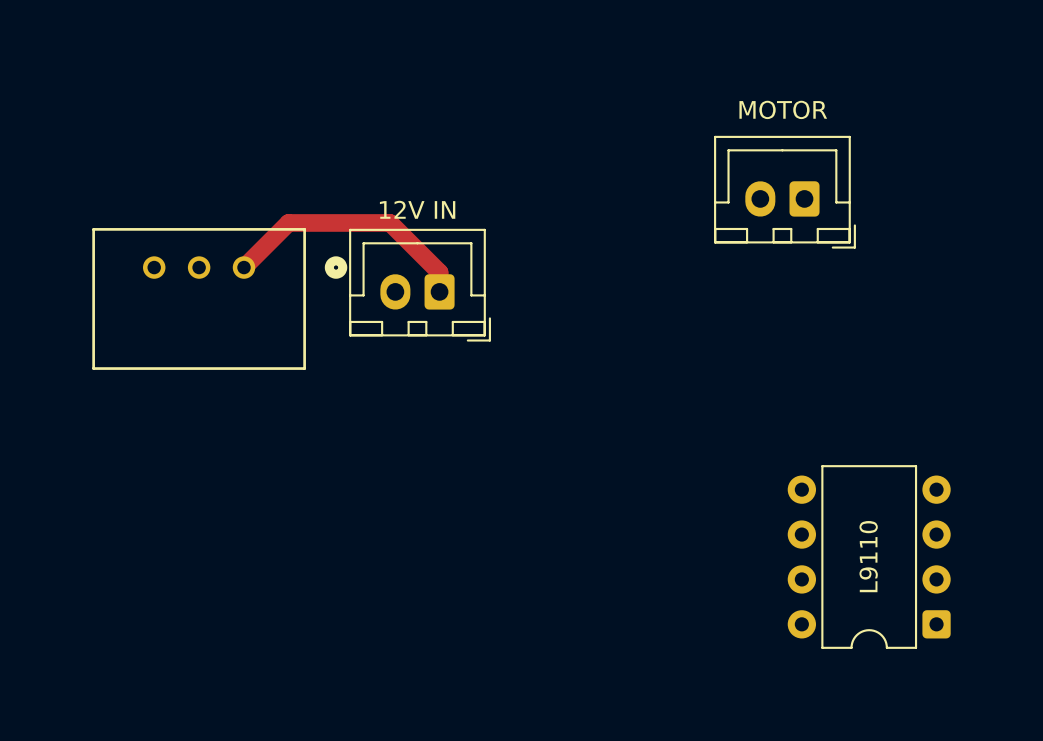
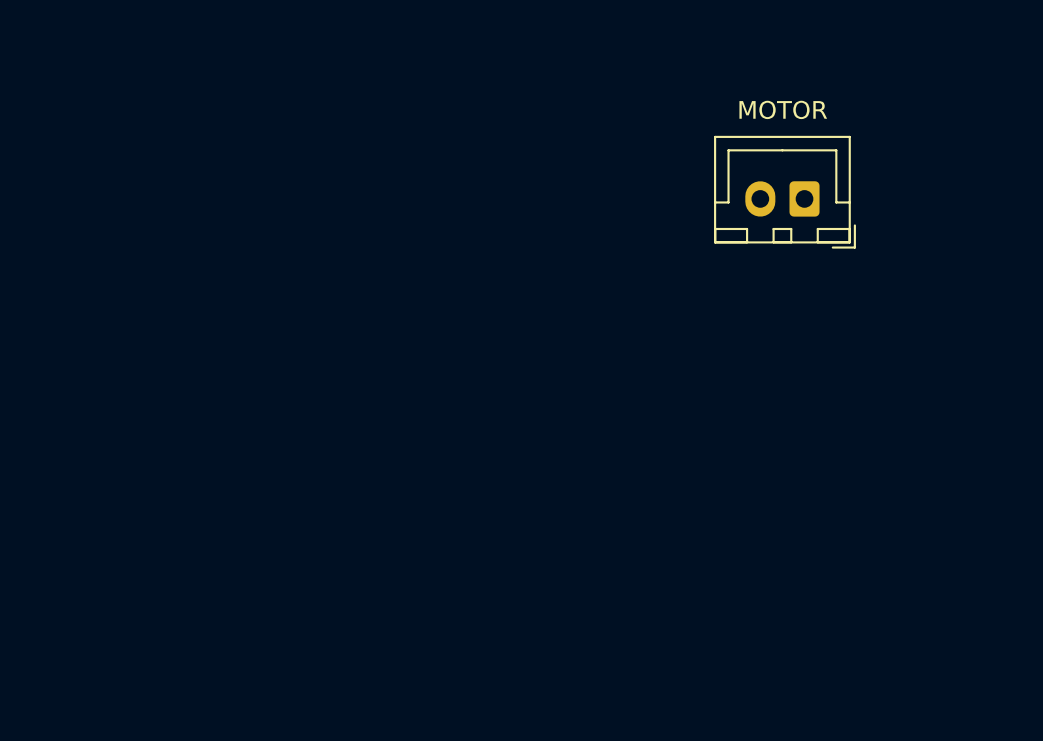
track: (244, 267) (288, 222) (390, 222) (439, 272) (439, 291) -> none
part: 12V IN (420, 285) -> none
part: (219, 298) -> none
part: L9110 (869, 557) -> none

